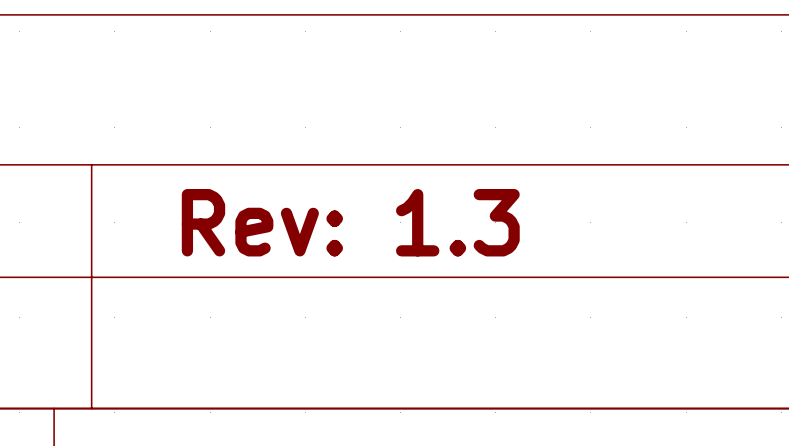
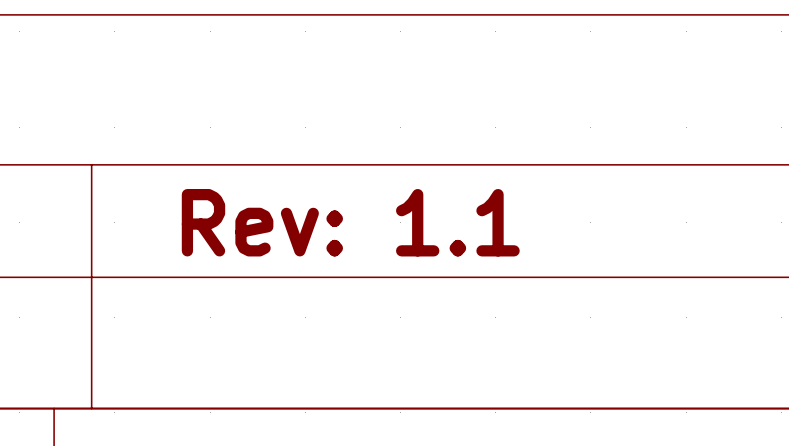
title block: Rev: 1.3 (350, 222) -> Rev: 1.1 (350, 222)

